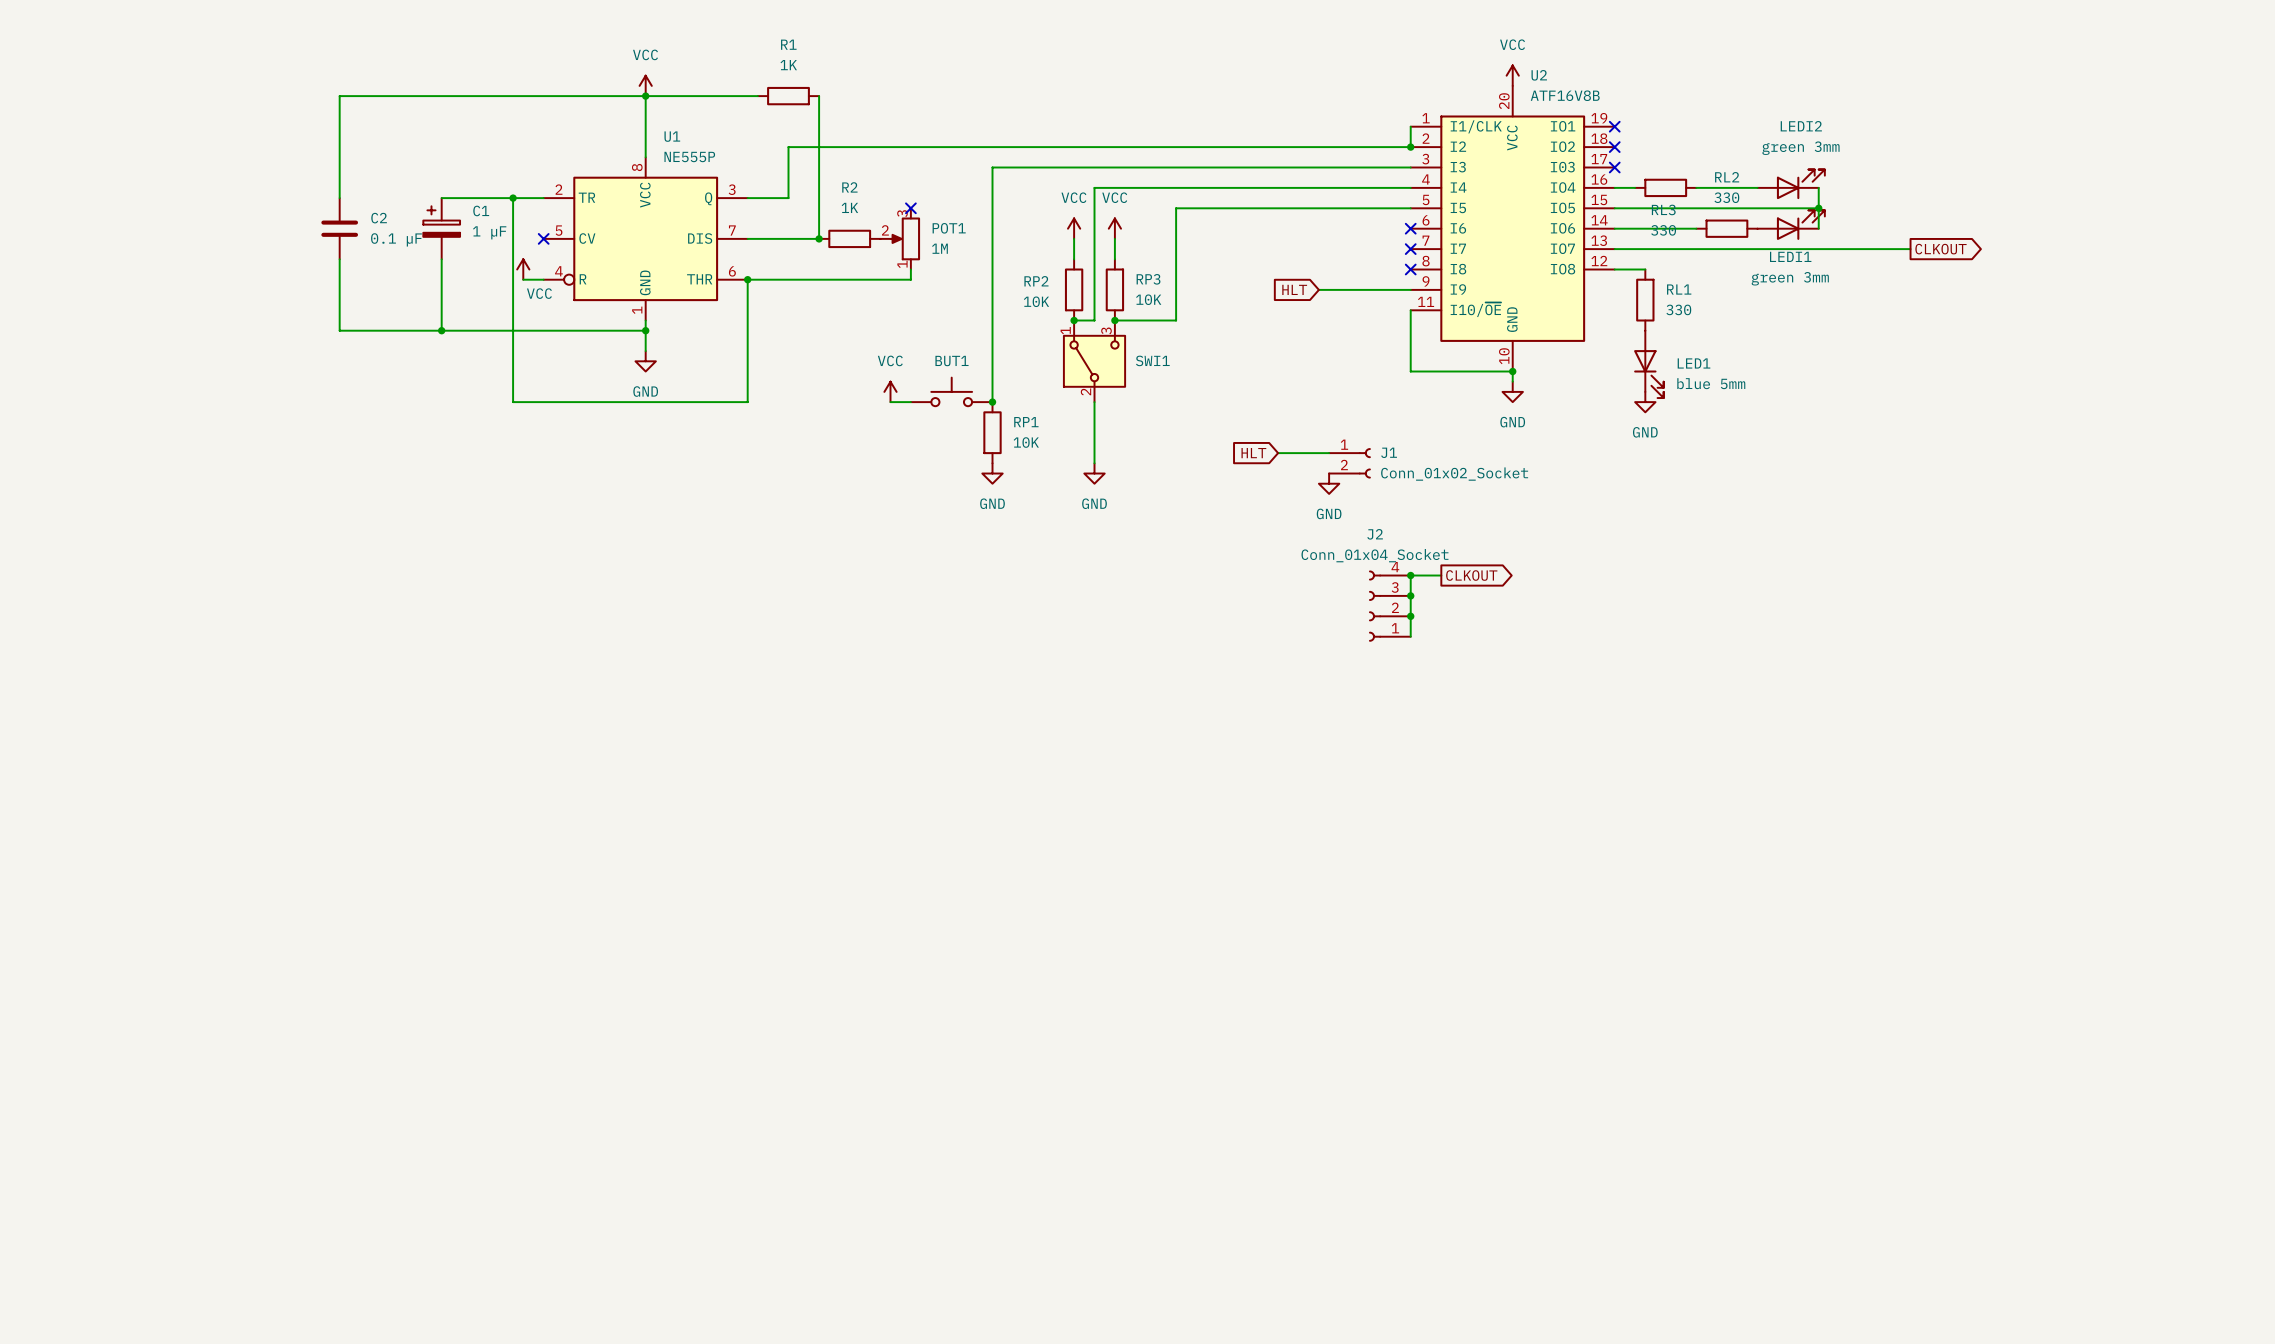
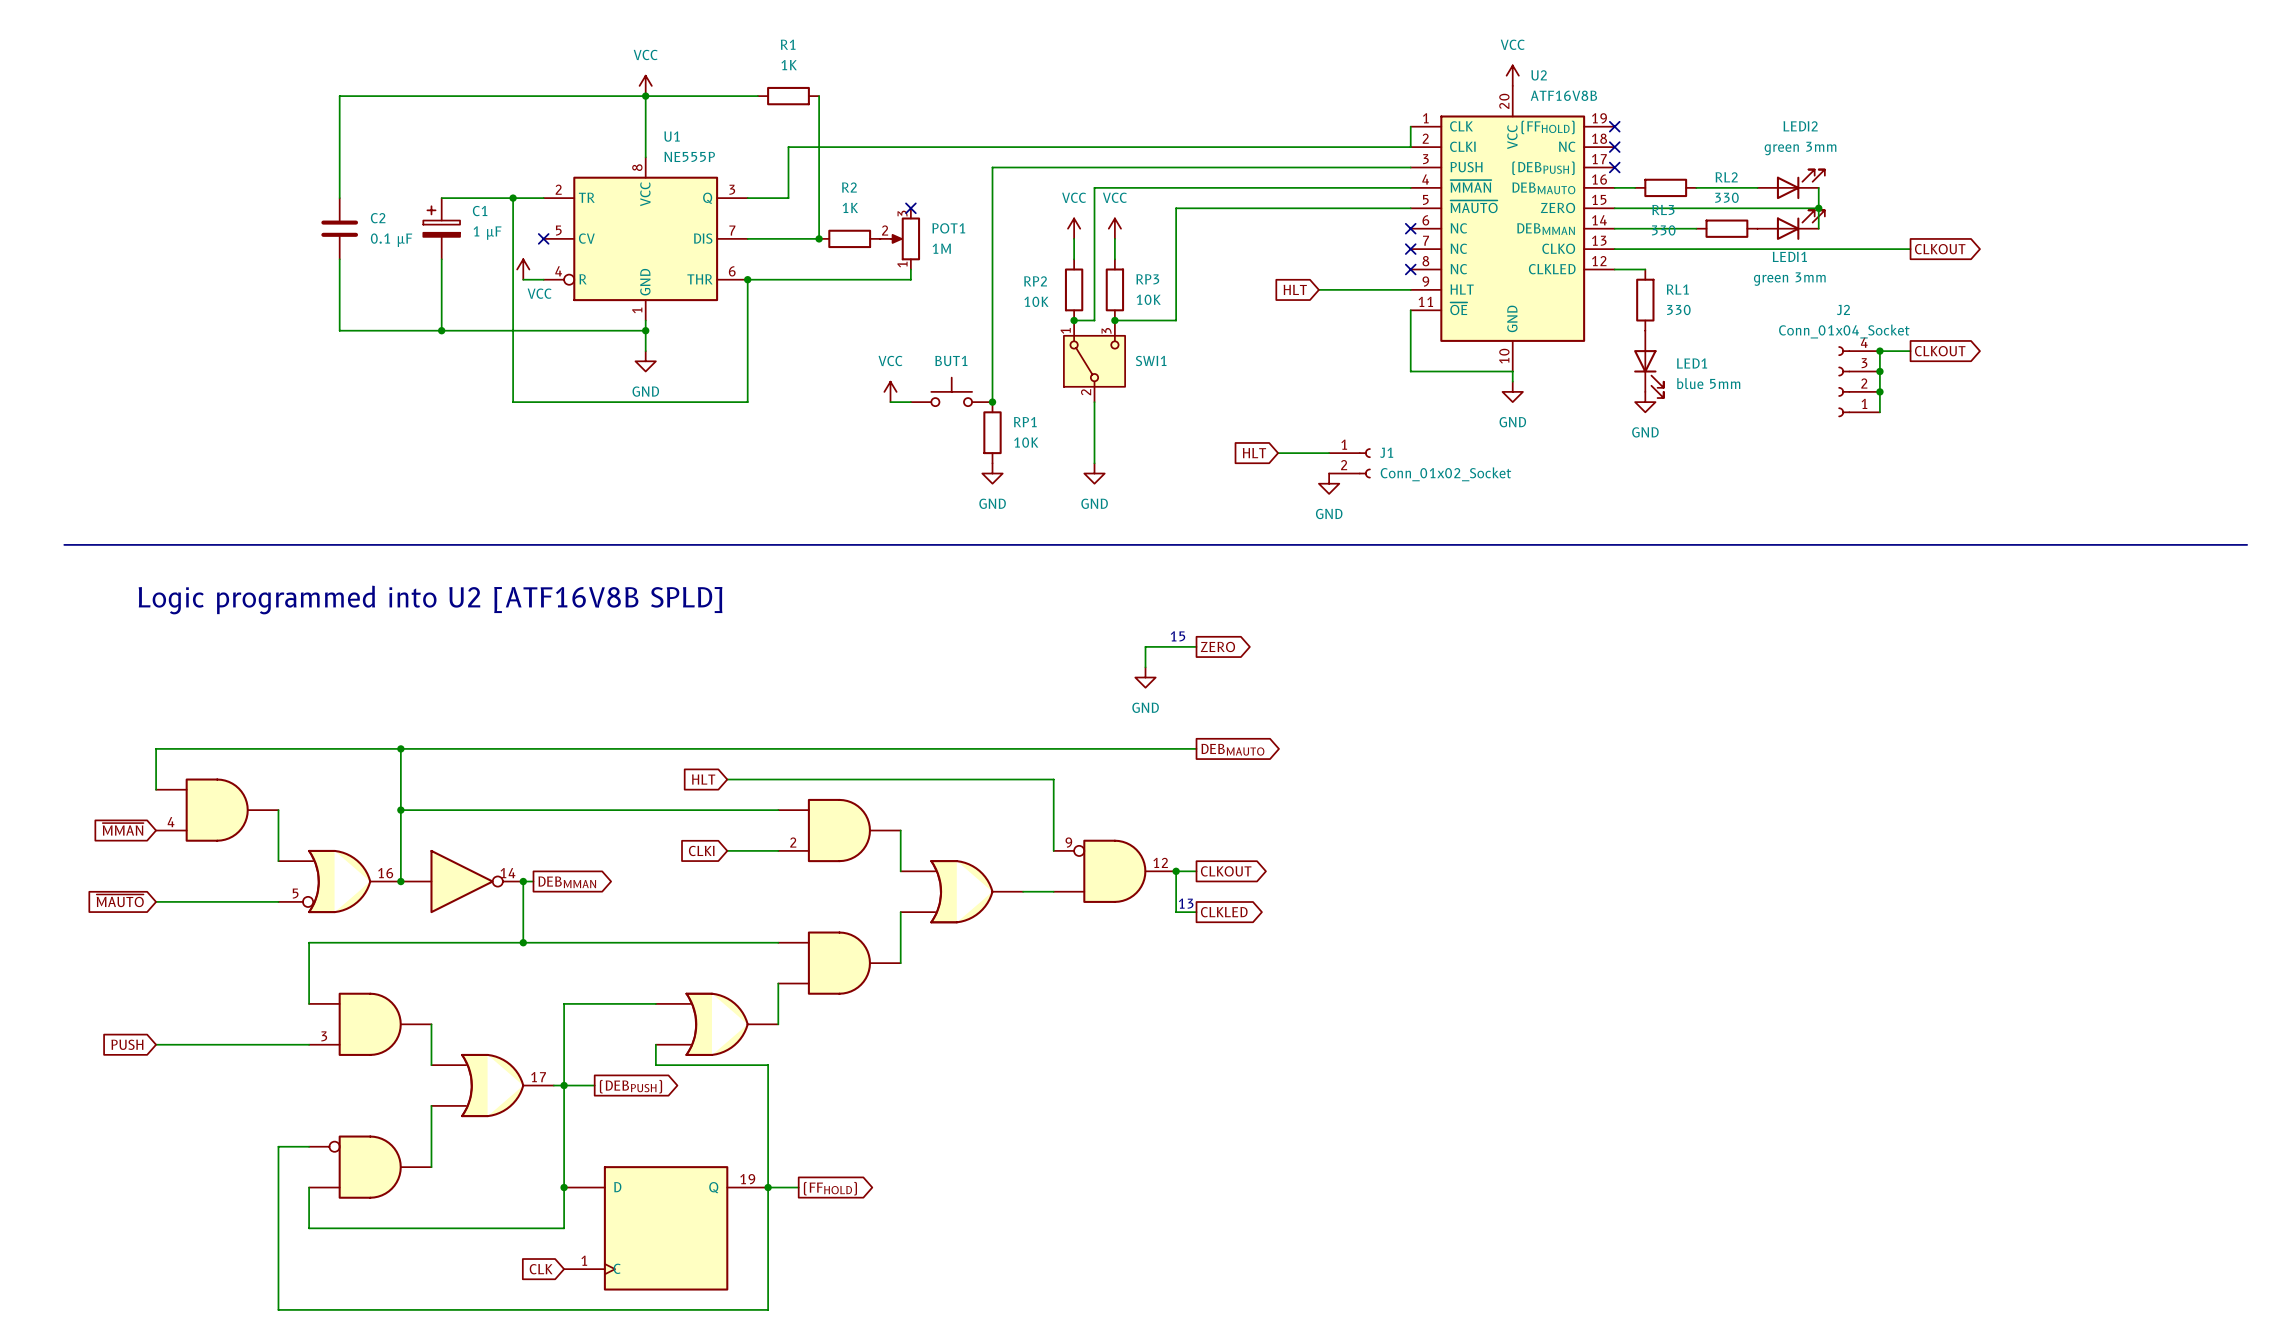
U2 symbol: [1410, 85, 1615, 372] -> [1410, 85, 1615, 372]
junction: (1410, 147) -> none
junction: none -> (1879, 351)
wire: none -> (1910, 351) (1879, 351) (1879, 412)
global label: none -> CLKOUT (1940, 351)
junction: (1512, 371) -> none
junction: none -> (1879, 371)
junction: none -> (1879, 391)
line: none -> (64, 544) (2247, 544)
junction: (1410, 575) -> none
wire: (1441, 575) (1410, 575) (1410, 636) -> none
global label: CLKOUT (1471, 575) -> none
junction: (1410, 595) -> none
text: none -> Logic programmed into U2 [ATF16V8B SPLD] (430, 600)
J2 position: (1390, 606) -> (1859, 381)
junction: (1410, 616) -> none
text: none -> 15 (1177, 636)
wire: none -> (1196, 646) (1145, 646) (1145, 667)
global label: none -> ZERO (1217, 646)
power symbol: none -> GND (1145, 677)
wire: none -> (400, 748) (400, 881)
junction: none -> (400, 748)
wire: none -> (1196, 748) (156, 748) (156, 789)
global label: none -> DEBMAUTO (1232, 749)
global label: none -> HLT (703, 779)
wire: none -> (727, 779) (1053, 779) (1053, 850)
part: none -> (217, 810)
wire: none -> (278, 810) (278, 861)
wire: none -> (400, 810) (778, 810)
junction: none -> (400, 810)
global label: none -> ~{MMAN} (123, 829)
part: none -> (839, 830)
wire: none -> (900, 830) (900, 871)
global label: none -> CLKI (701, 850)
wire: none -> (727, 850) (778, 850)
part: none -> (1114, 871)
junction: none -> (1176, 871)
wire: none -> (1196, 871) (1176, 871) (1176, 912) (1196, 912)
global label: none -> CLKOUT (1226, 871)
part: none -> (339, 881)
junction: none -> (400, 881)
part: none -> (462, 881)
junction: none -> (523, 881)
wire: none -> (533, 881) (523, 881) (523, 942)
global label: none -> DEBMMAN (567, 882)
part: none -> (961, 891)
wire: none -> (1023, 891) (1053, 891)
global label: none -> ~{MAUTO} (120, 900)
wire: none -> (156, 901) (278, 901)
text: none -> 13 (1186, 903)
wire: none -> (900, 912) (900, 963)
global label: none -> CLKLED (1224, 912)
junction: none -> (523, 942)
wire: none -> (778, 942) (309, 942) (309, 1003)
part: none -> (839, 963)
wire: none -> (778, 983) (778, 1024)
wire: none -> (655, 1003) (564, 1003) (564, 1228) (309, 1228) (309, 1187)
part: none -> (370, 1024)
wire: none -> (431, 1024) (431, 1065)
part: none -> (717, 1024)
global label: none -> PUSH (127, 1044)
wire: none -> (156, 1044) (309, 1044)
wire: none -> (655, 1044) (655, 1065) (768, 1065) (768, 1309) (278, 1309) (278, 1146) (309, 1146)
part: none -> (492, 1085)
wire: none -> (553, 1085) (594, 1085)
junction: none -> (564, 1085)
global label: none -> (DEBPUSH) (630, 1086)
wire: none -> (431, 1105) (431, 1167)
part: none -> (370, 1167)
junction: none -> (564, 1187)
wire: none -> (768, 1187) (798, 1187)
junction: none -> (768, 1187)
global label: none -> (FFHOLD) (830, 1188)
part: none -> (666, 1228)
global label: none -> CLK (541, 1269)

